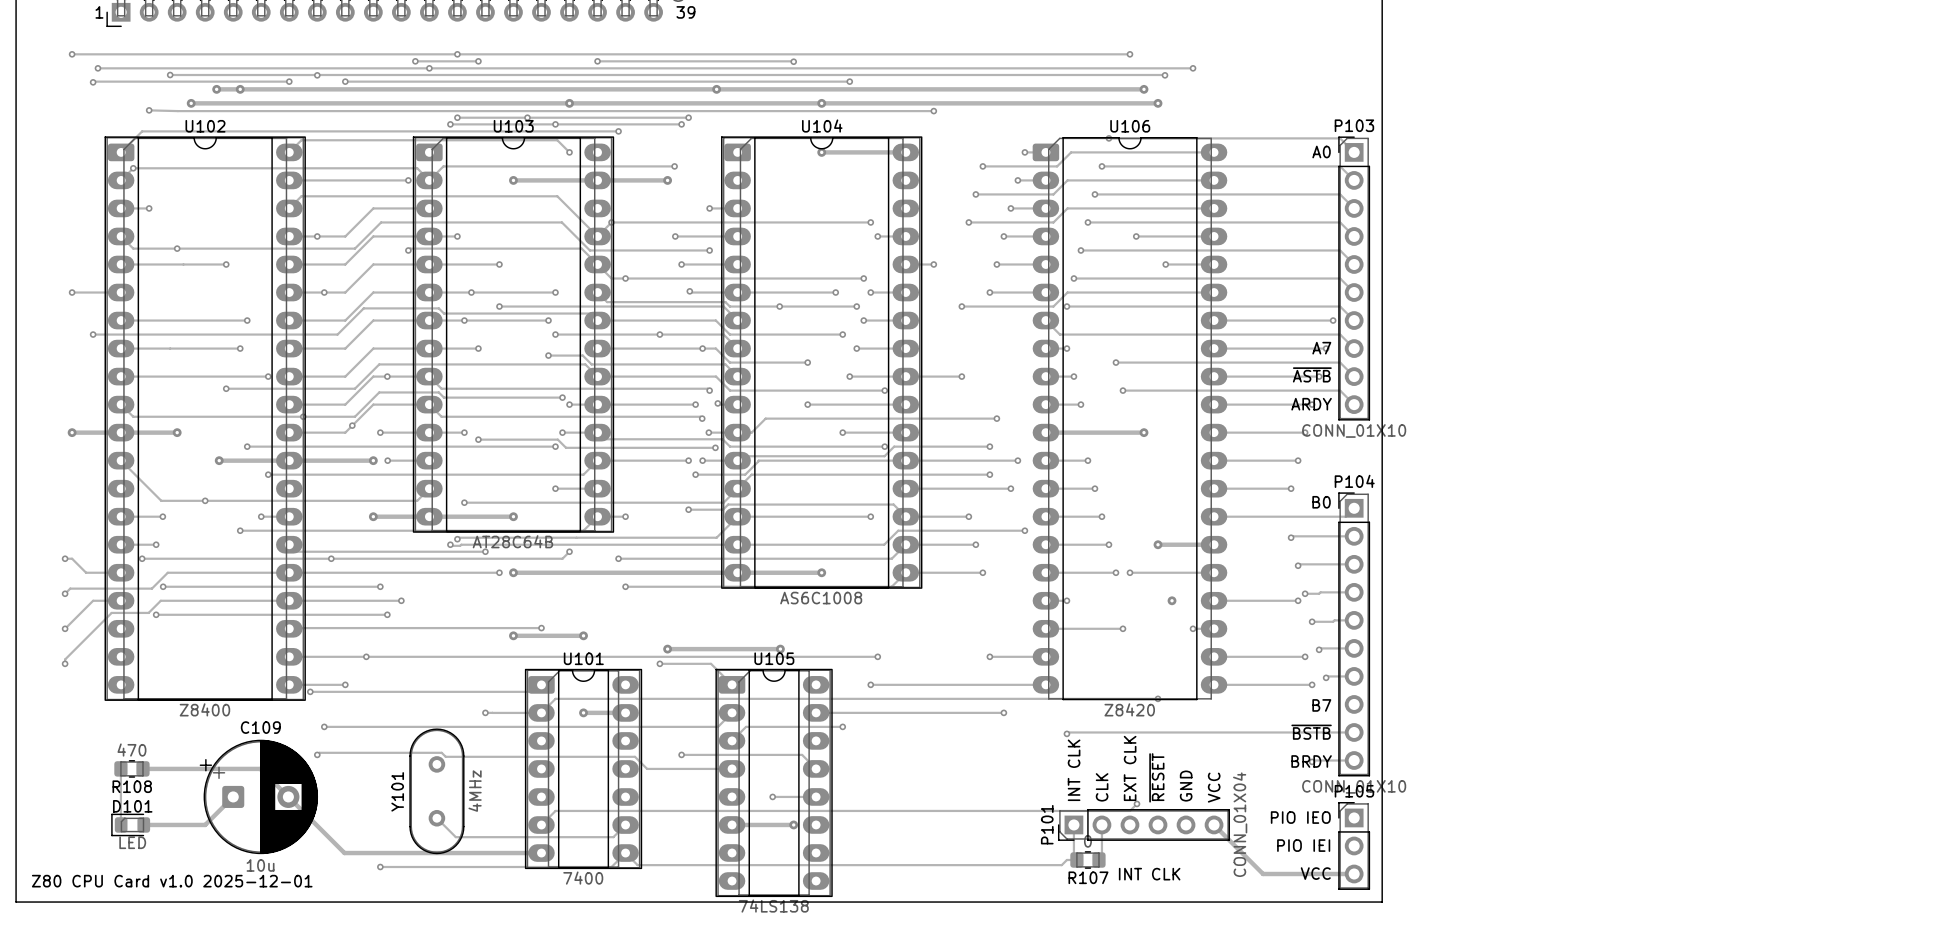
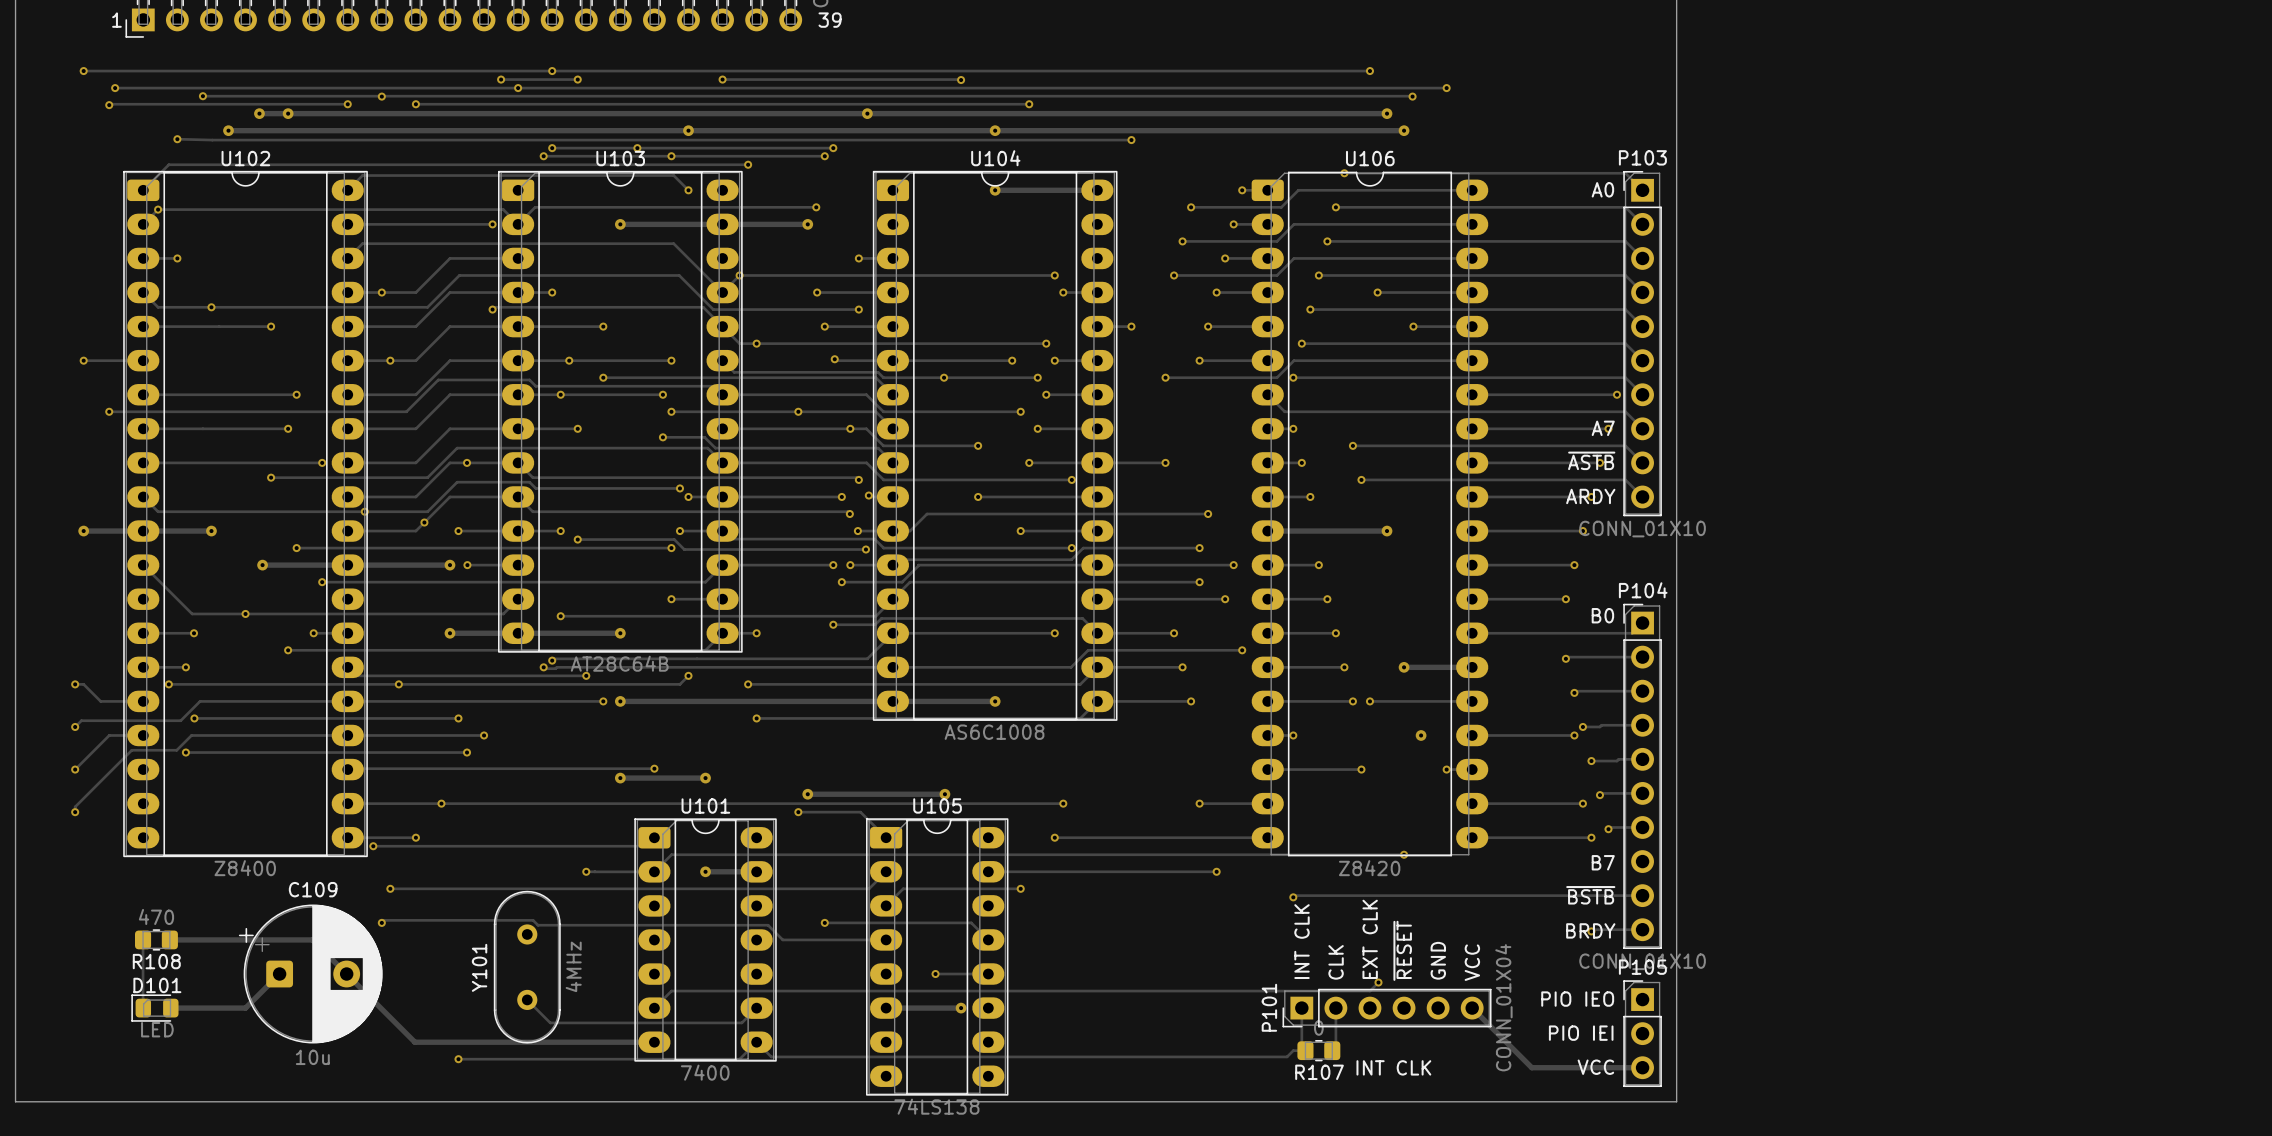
text: Z80 CPU Card v1.0 2025-12-01 (172, 881) -> none

